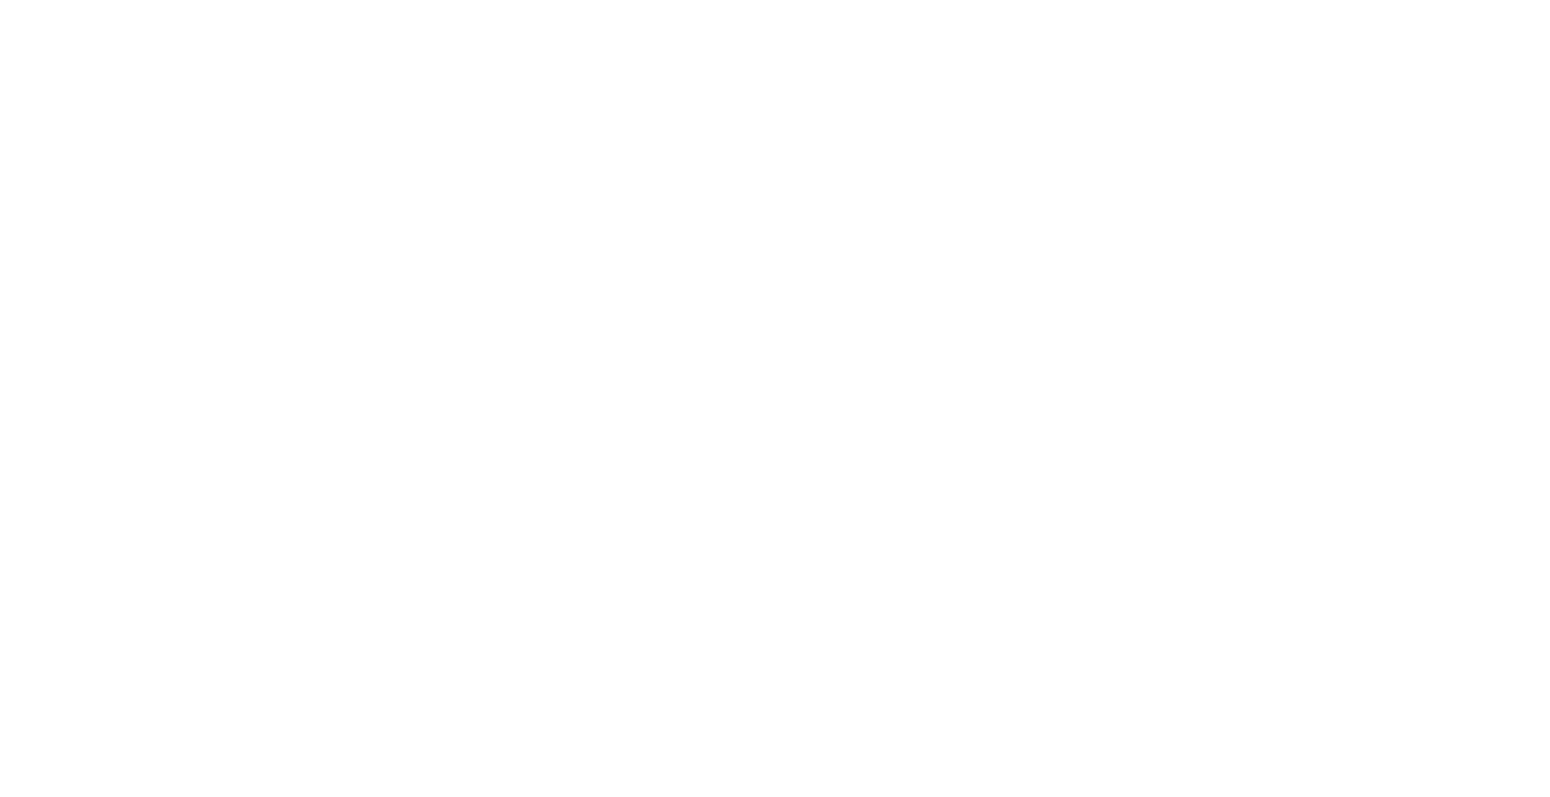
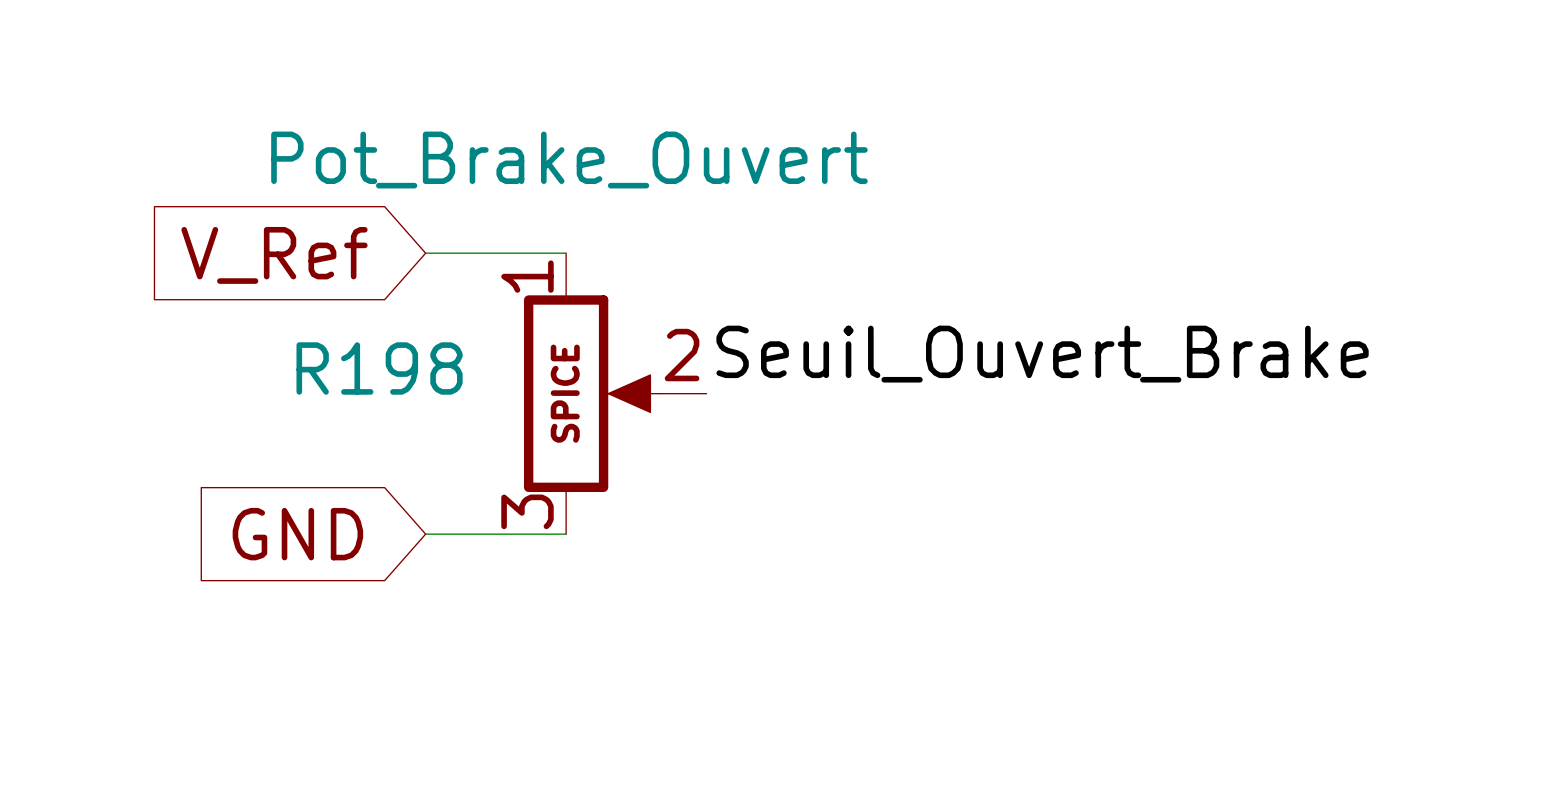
wire: none -> (425, 253) (566, 253)
global label: none -> V_Ref (274, 255)
label: none -> Seuil_Ouvert_Brake (1042, 354)
R198: none -> (615, 393)
global label: none -> GND (297, 534)
wire: none -> (425, 534) (566, 534)

